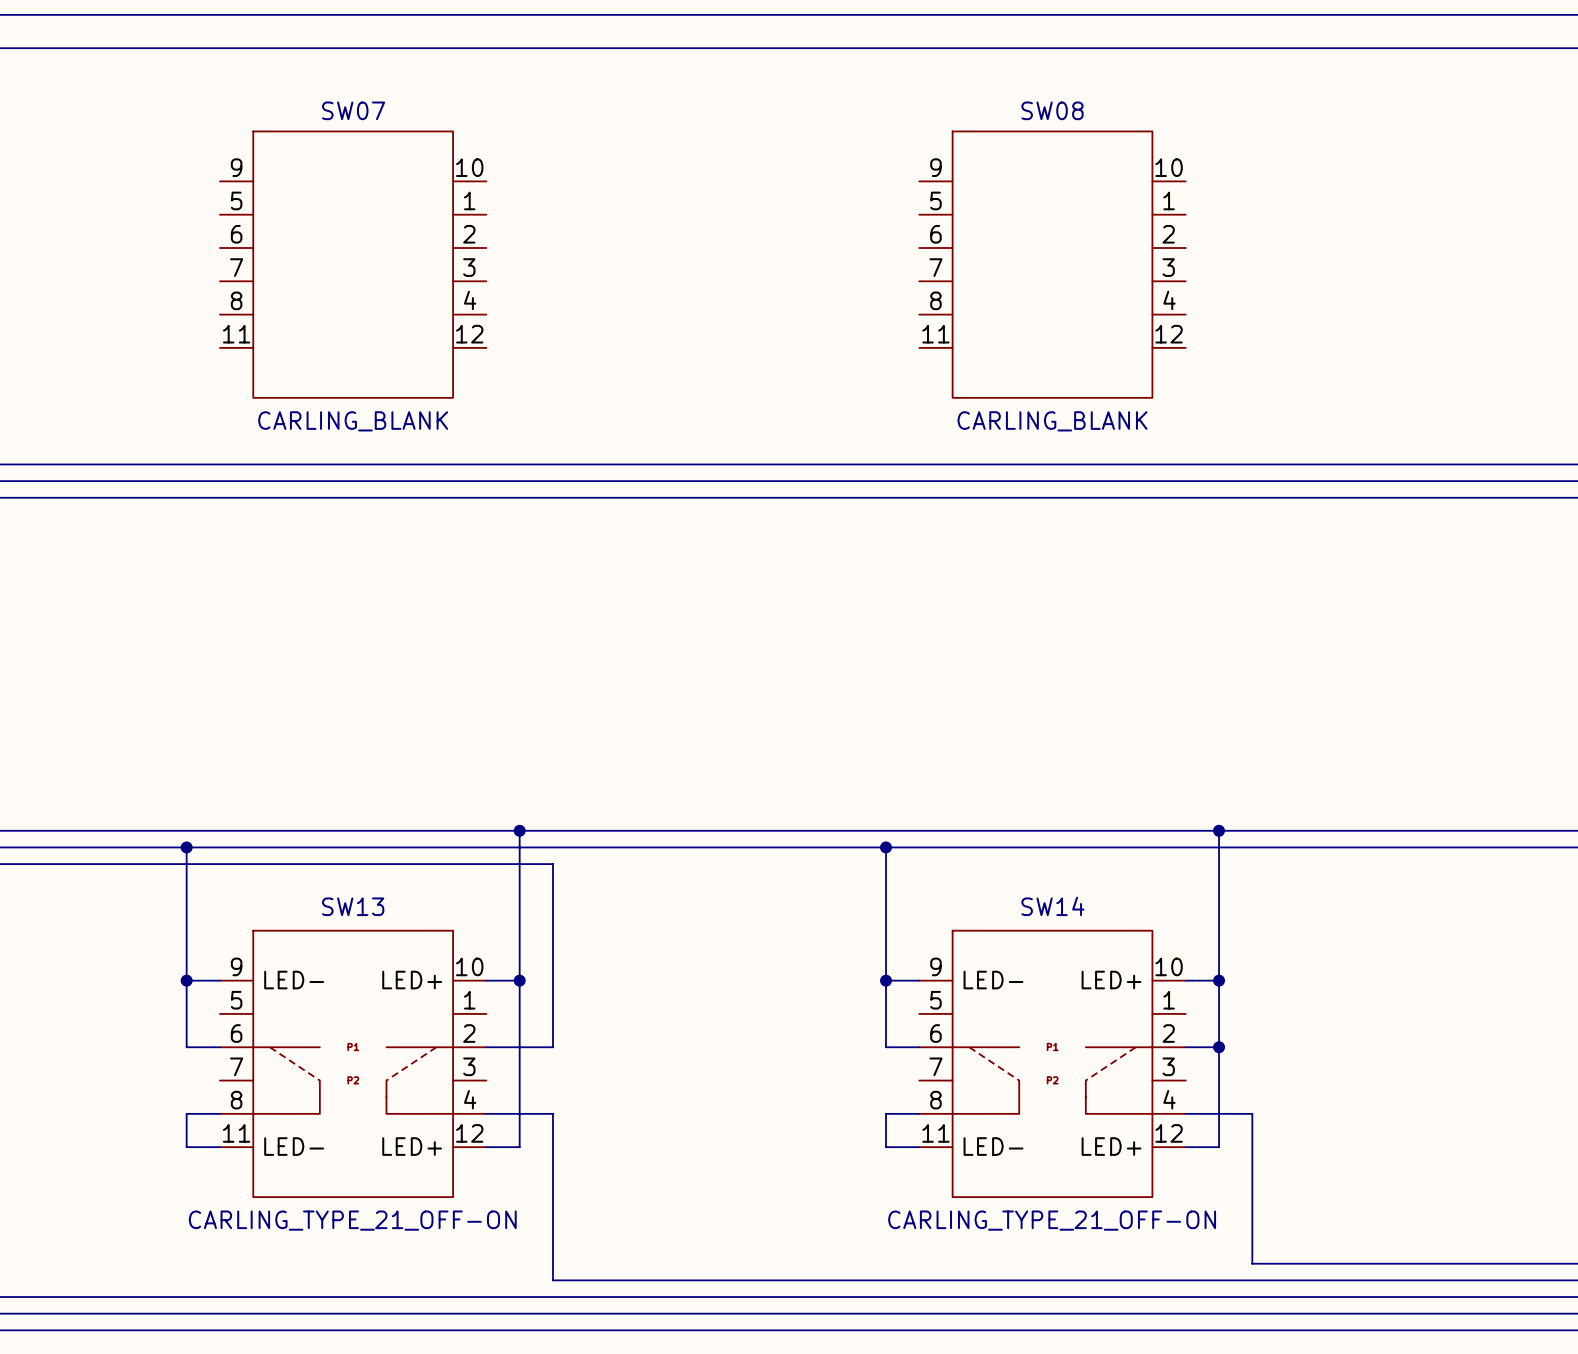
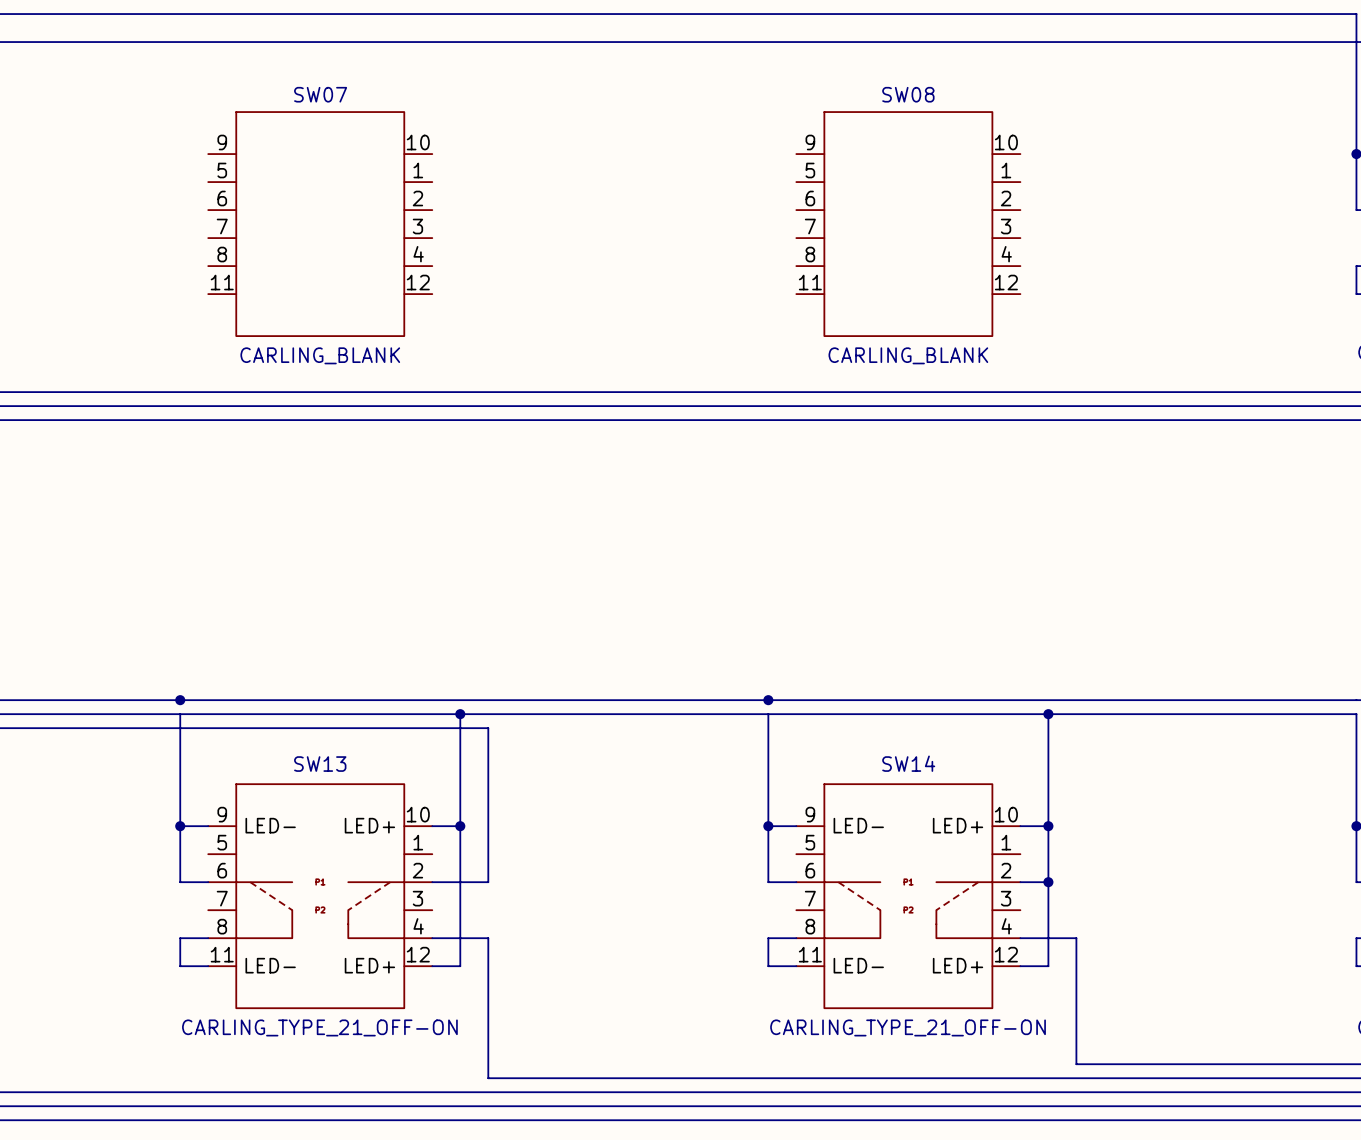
wire: (519, 830) (519, 847) -> none
junction position: (519, 830) -> (460, 714)
wire: (1219, 830) (1219, 847) -> none
junction position: (1219, 830) -> (1048, 714)
junction position: (186, 847) -> (180, 700)
junction position: (886, 847) -> (768, 700)

